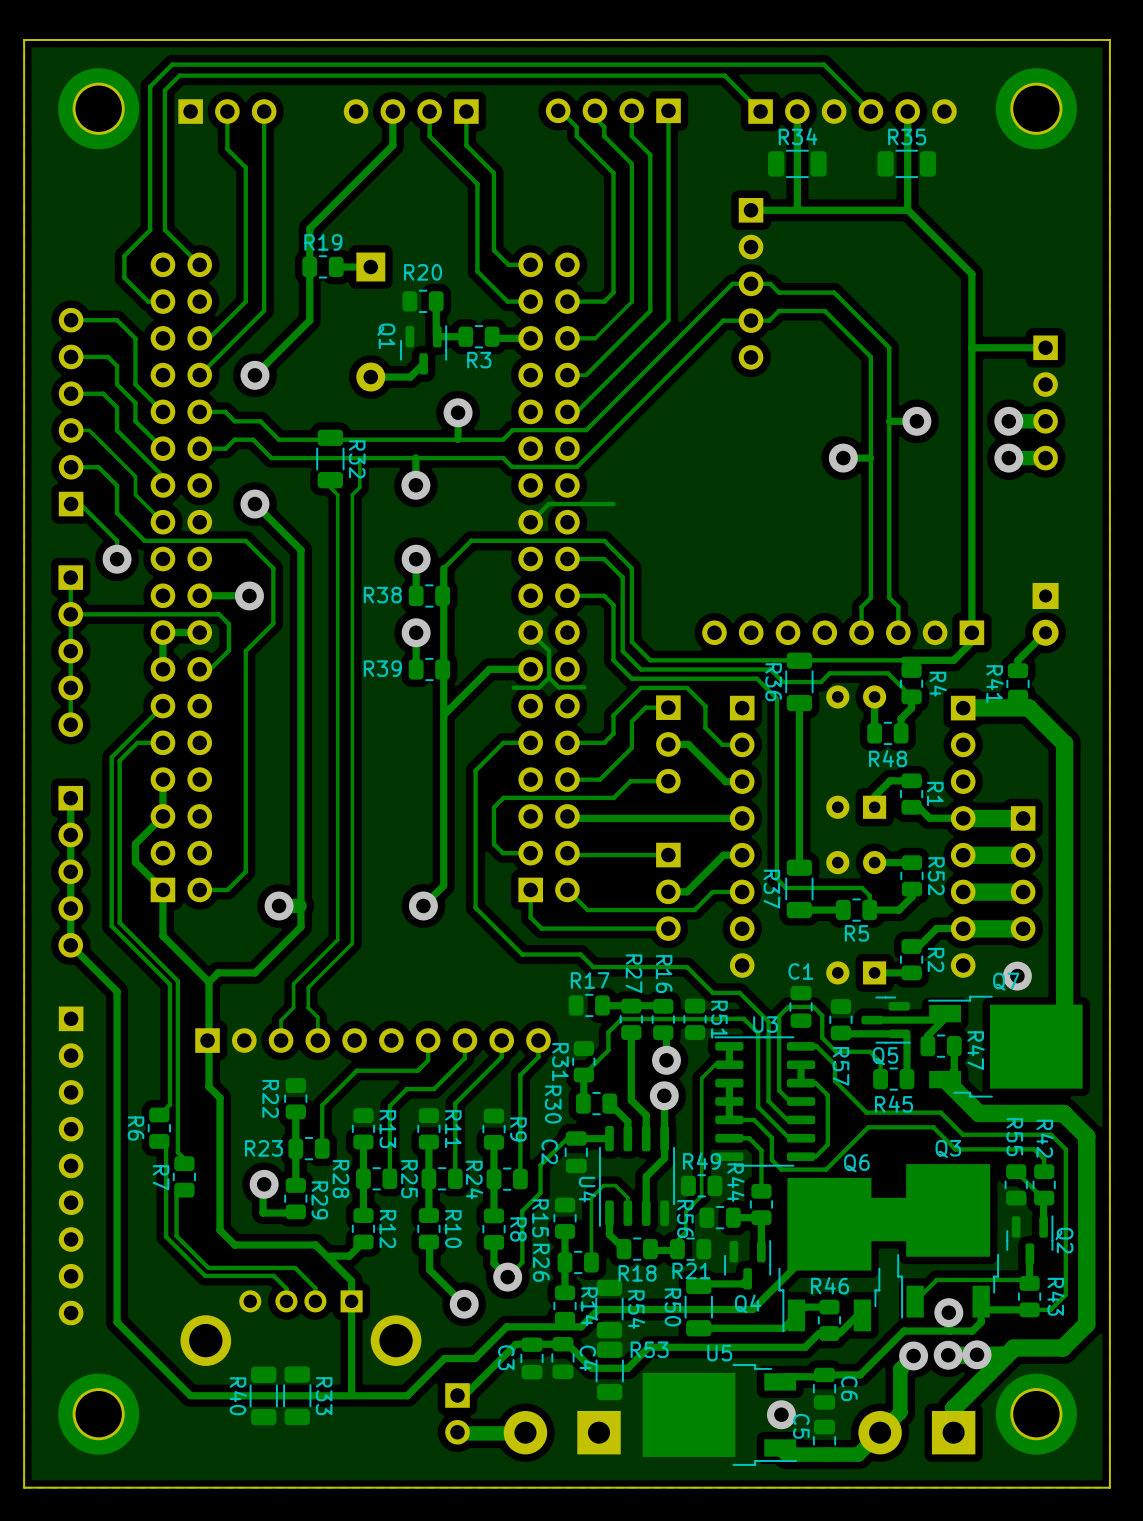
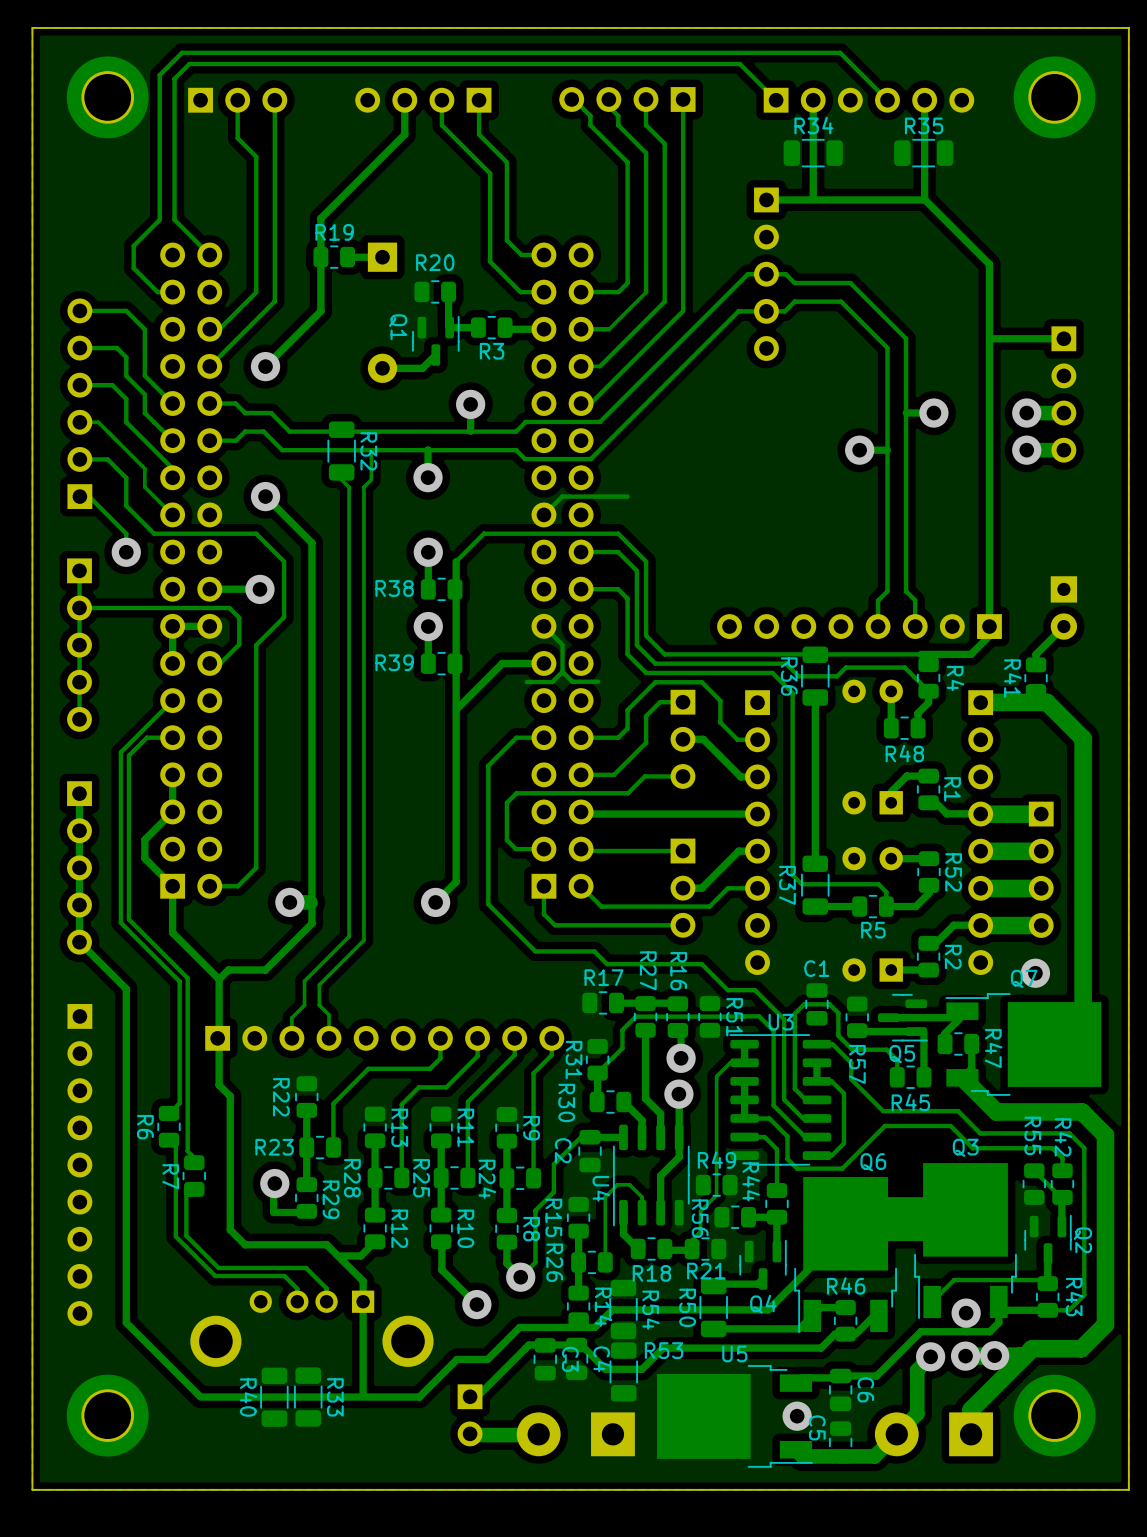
C3 name position: C3 (506, 1357) -> C3 (570, 1359)

